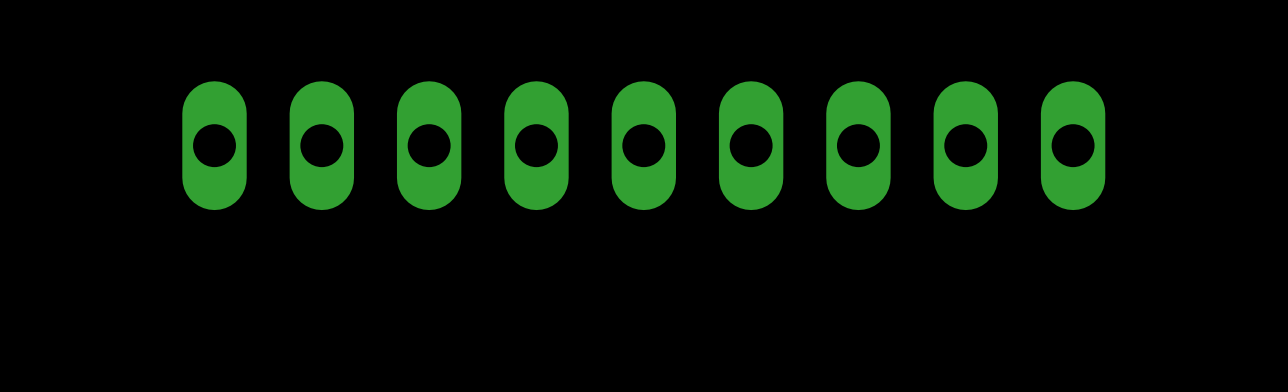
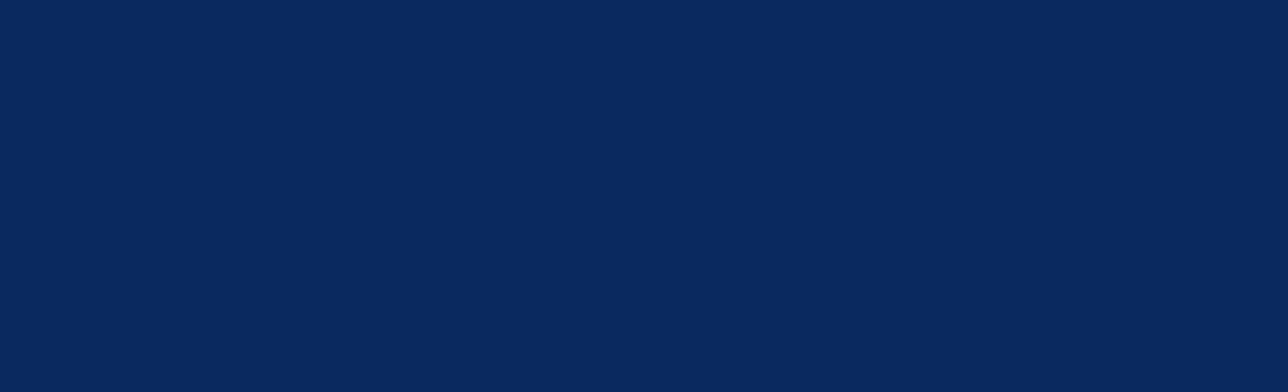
part: (643, 145) -> none

